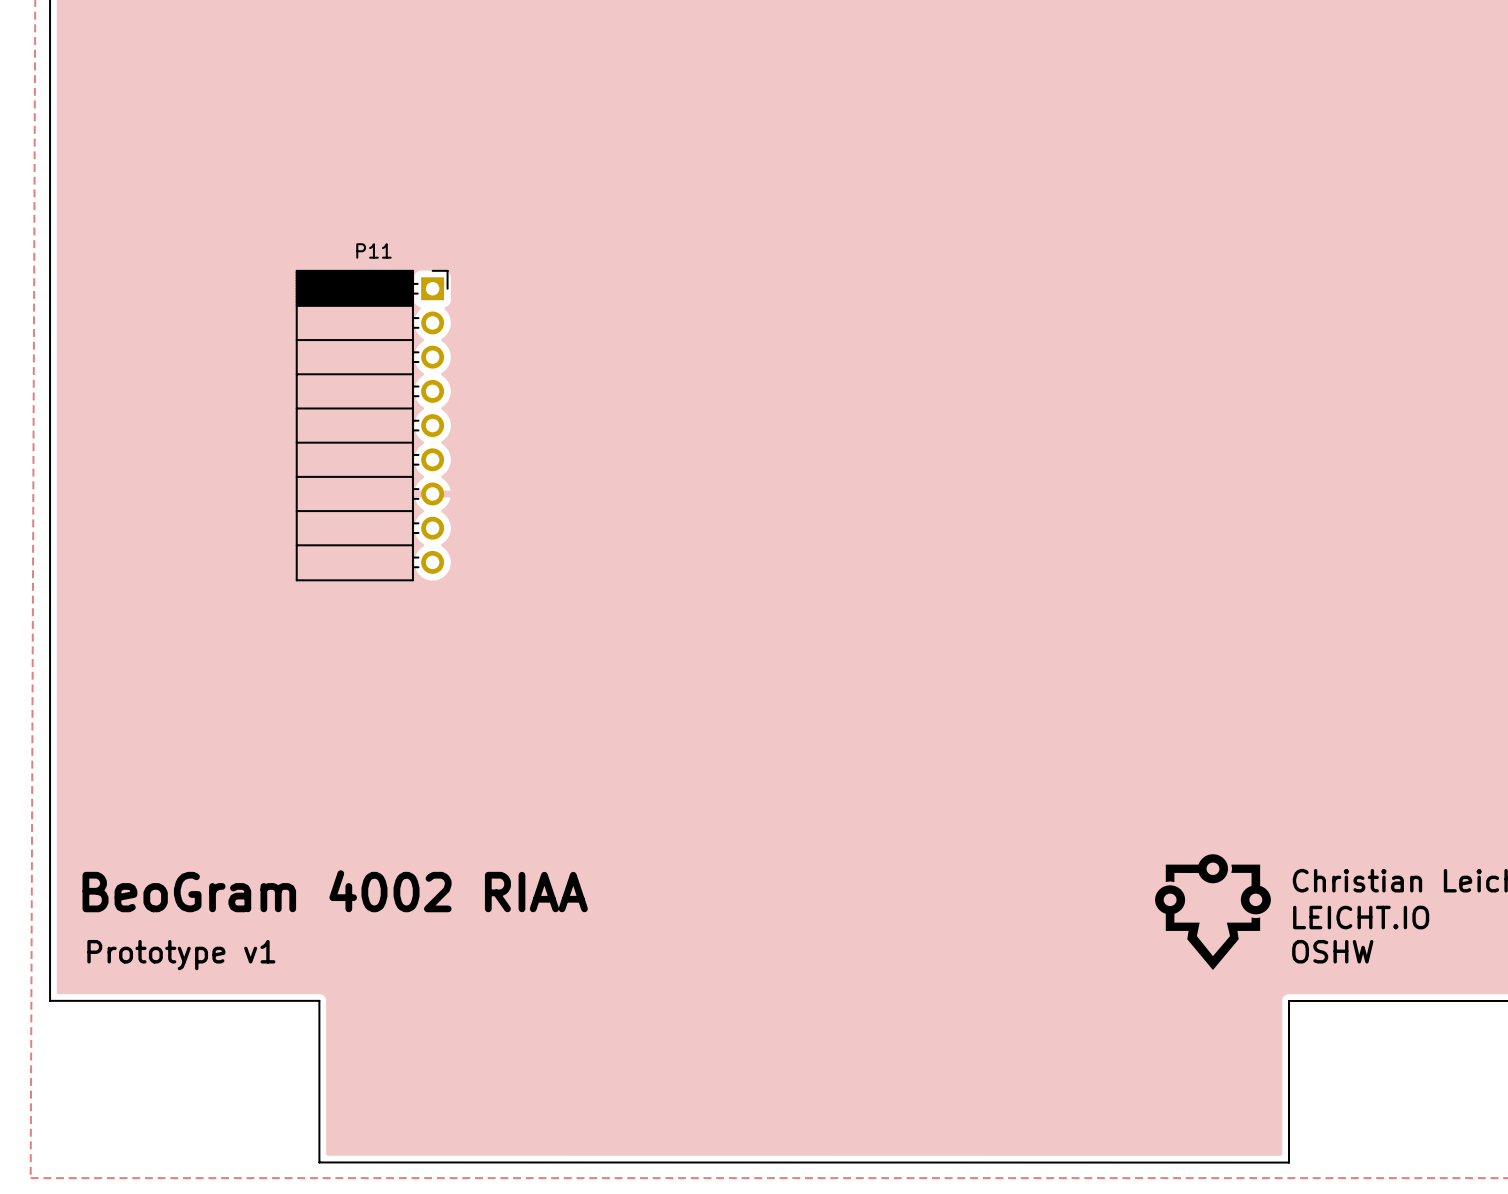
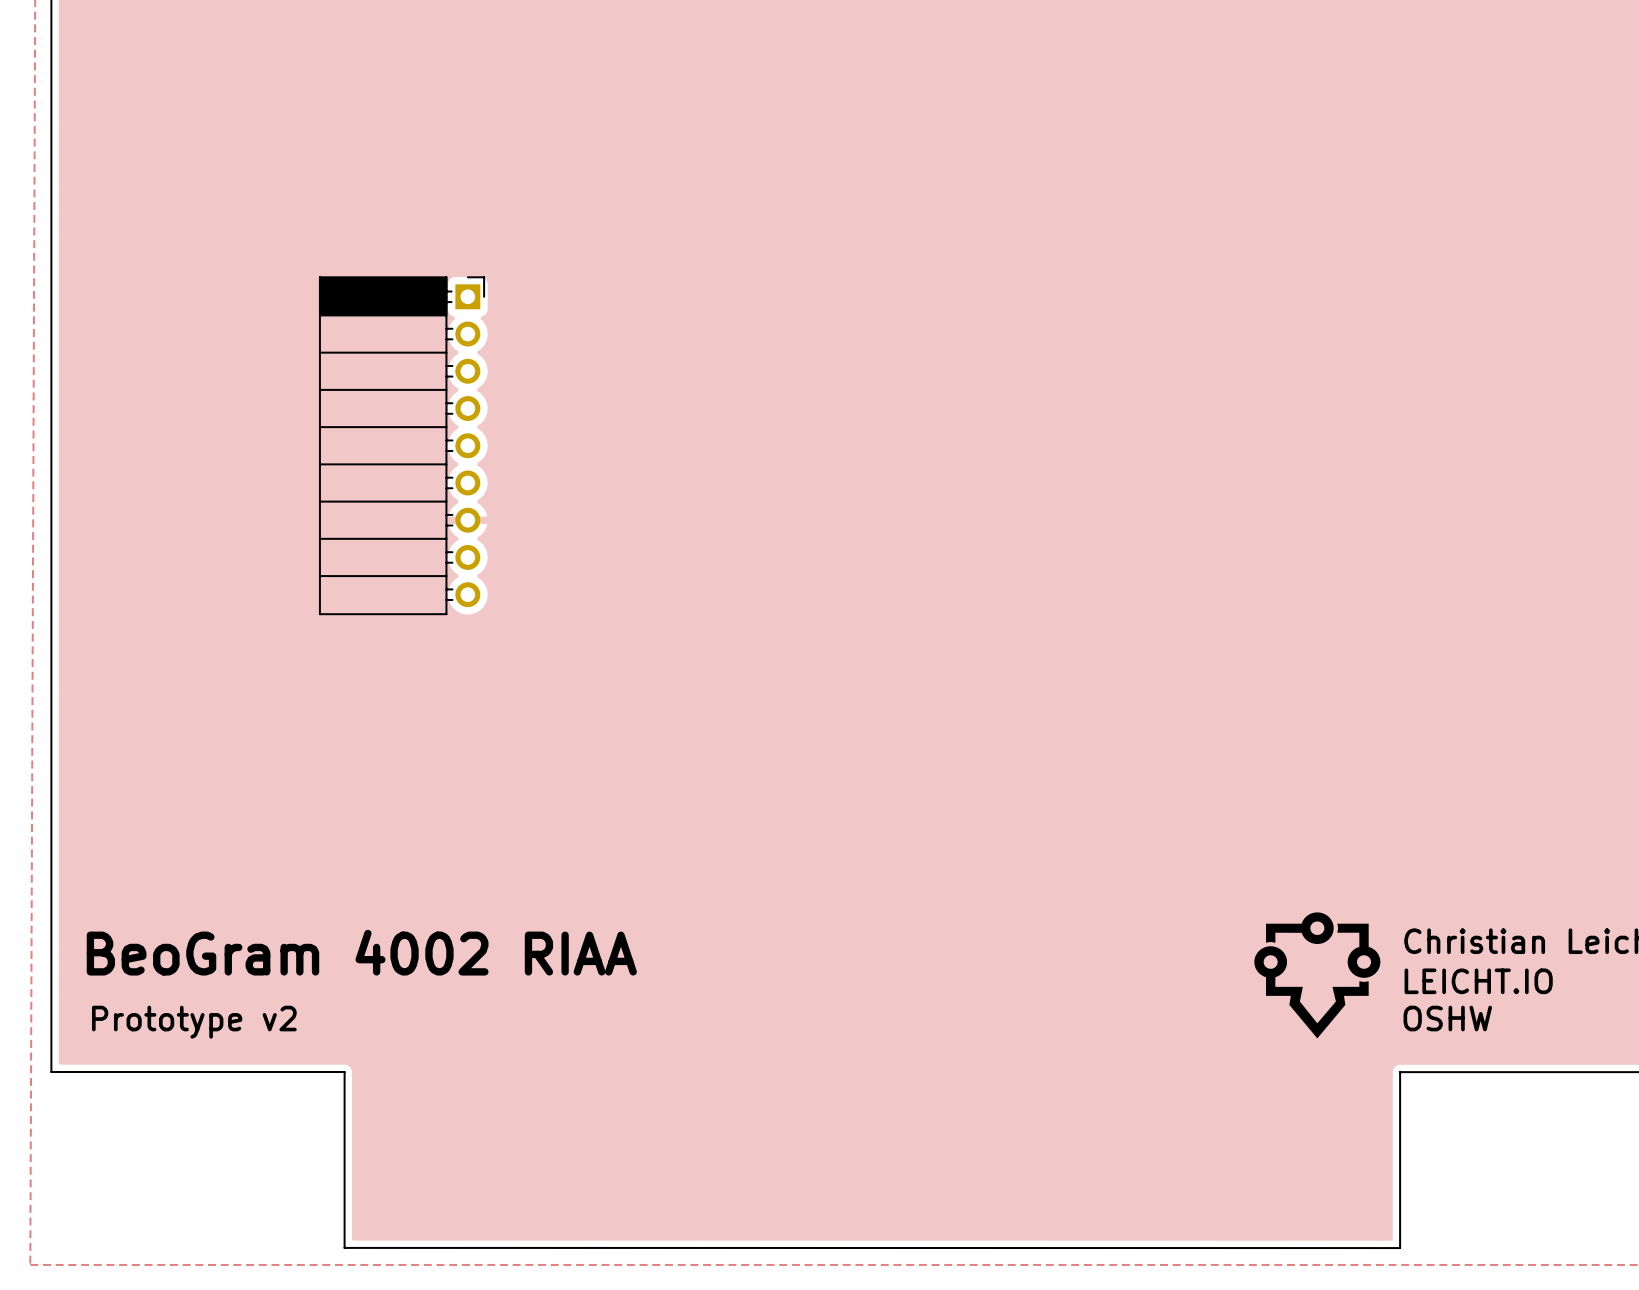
P11 name: P11 (373, 250) -> none
text: Prototype v1 (181, 955) -> Prototype v2 (194, 1022)

